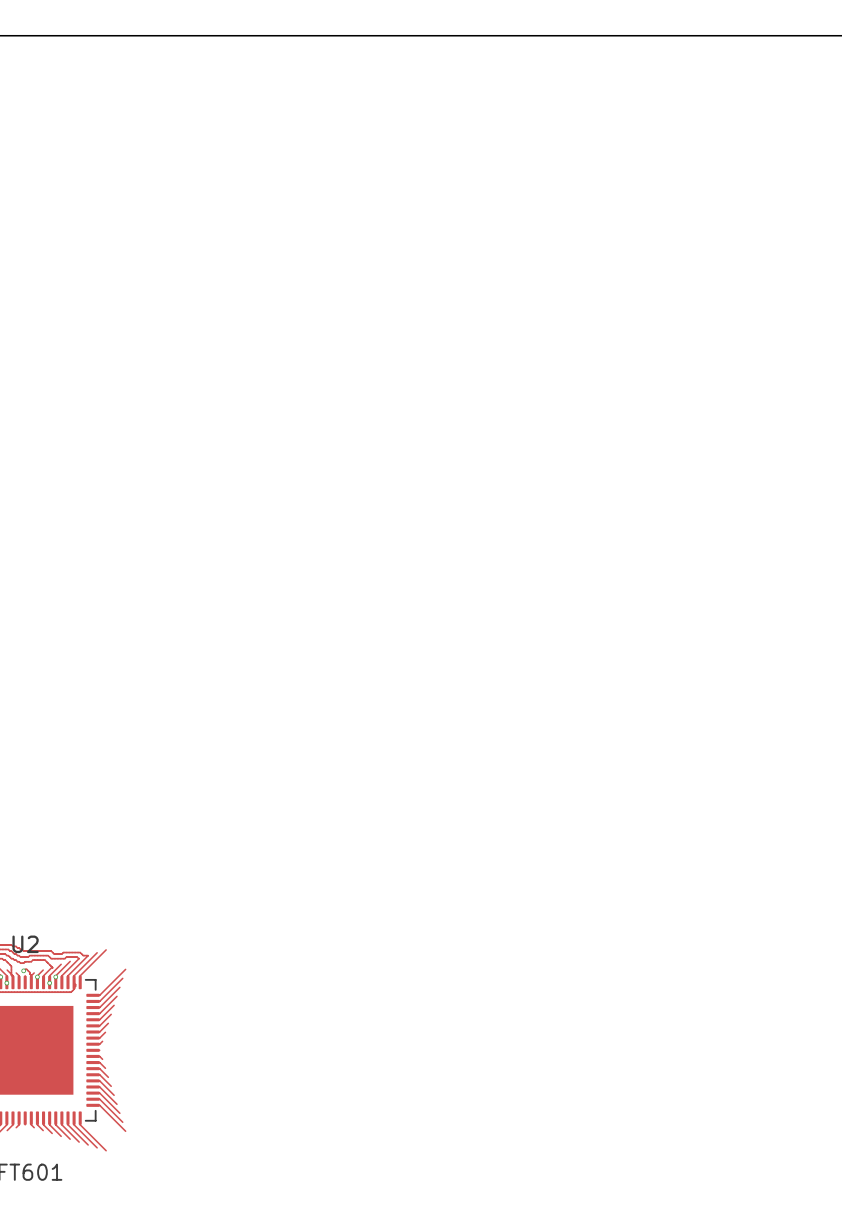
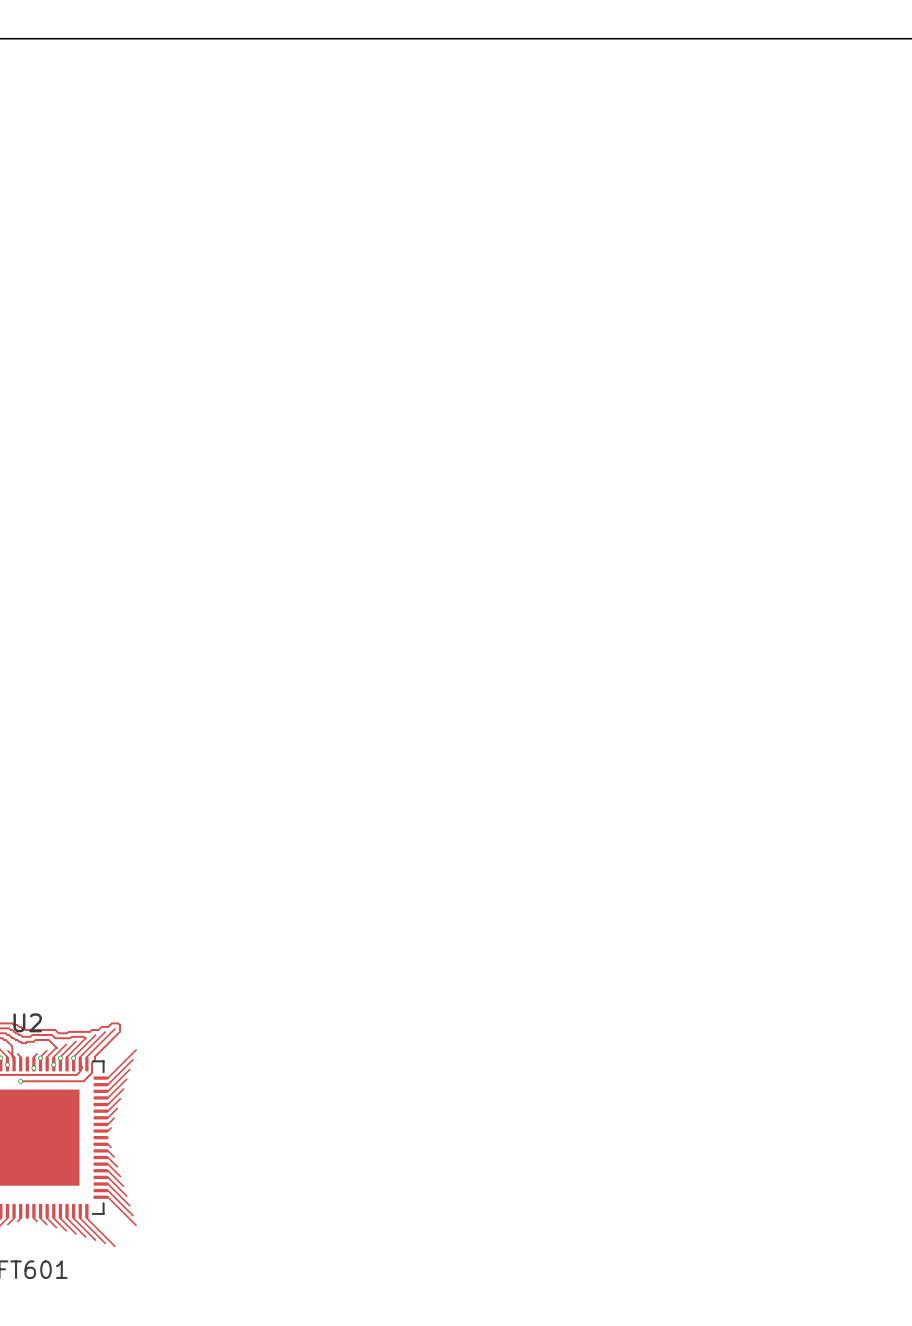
track: (80, 952) (83, 955) (88, 955) -> (86, 1031) (98, 1030) (111, 1023) (119, 1025) (119, 1031) (95, 1056) (91, 1063) (91, 1073) (83, 1081) (20, 1081)
track: (23, 970) (26, 969) (31, 975) -> none
via: (23, 970) -> none
via: none -> (73, 1058)
via: none -> (33, 1068)
via: none -> (20, 1081)

